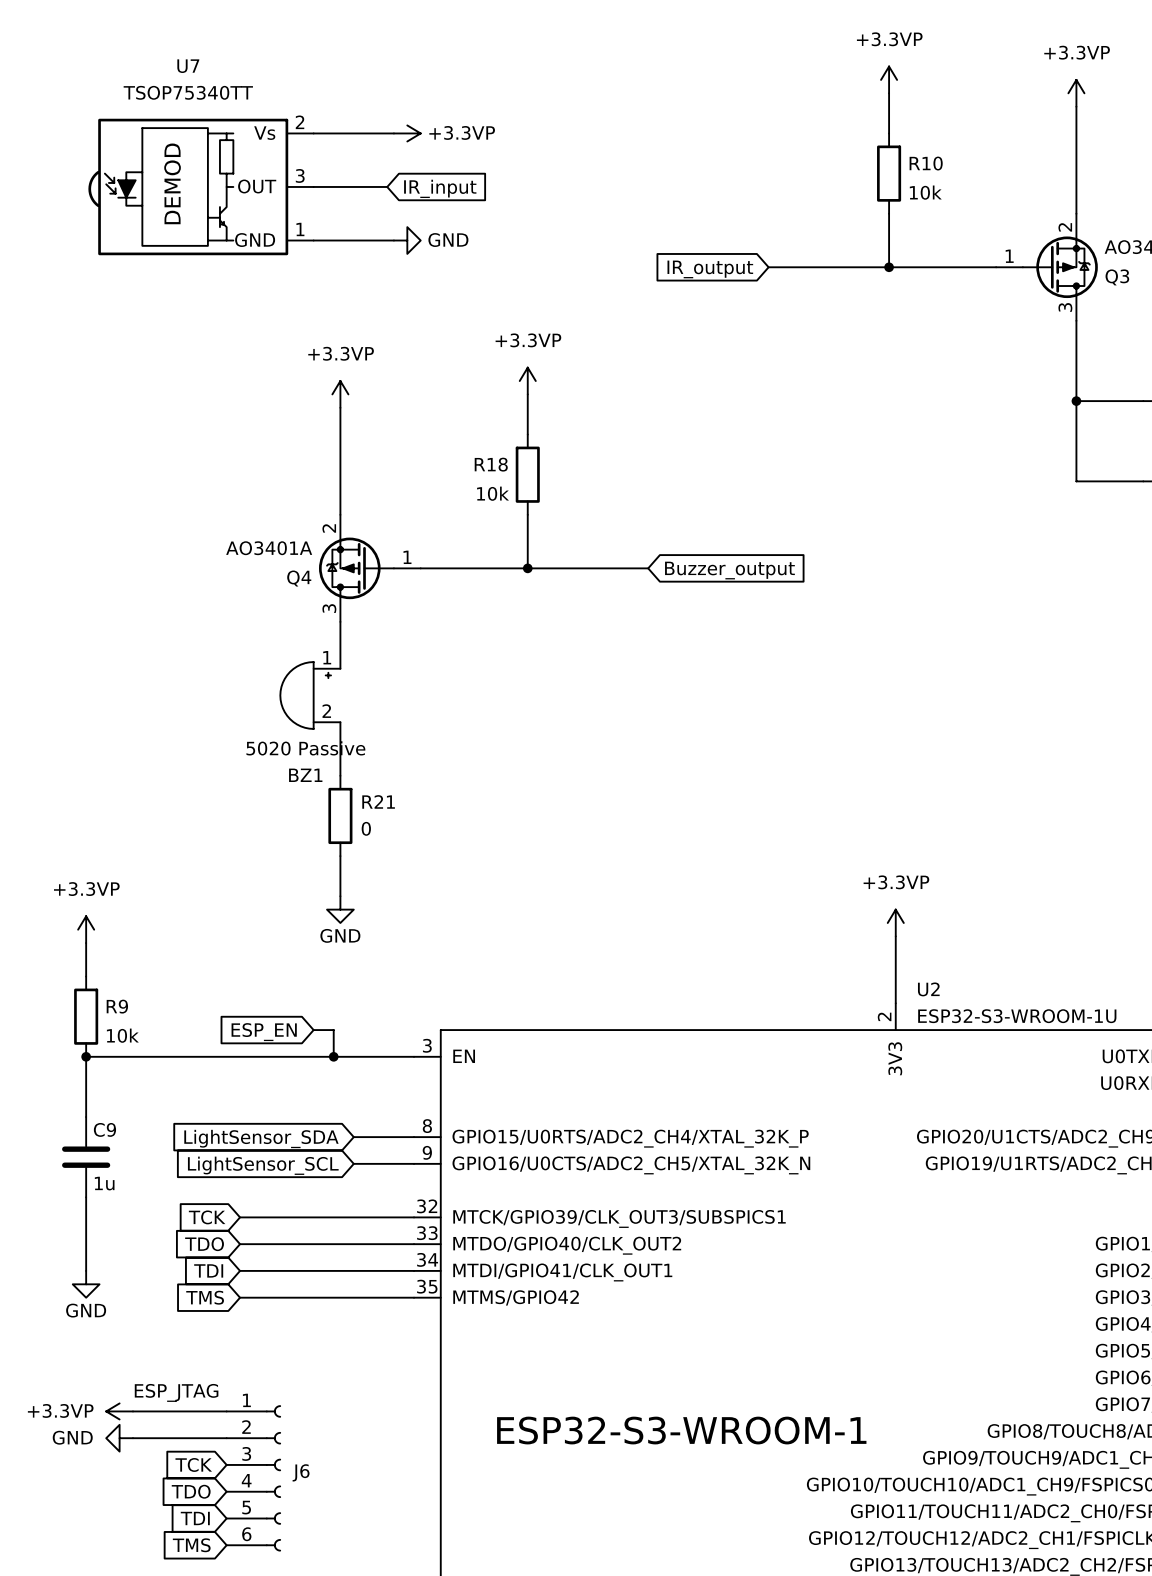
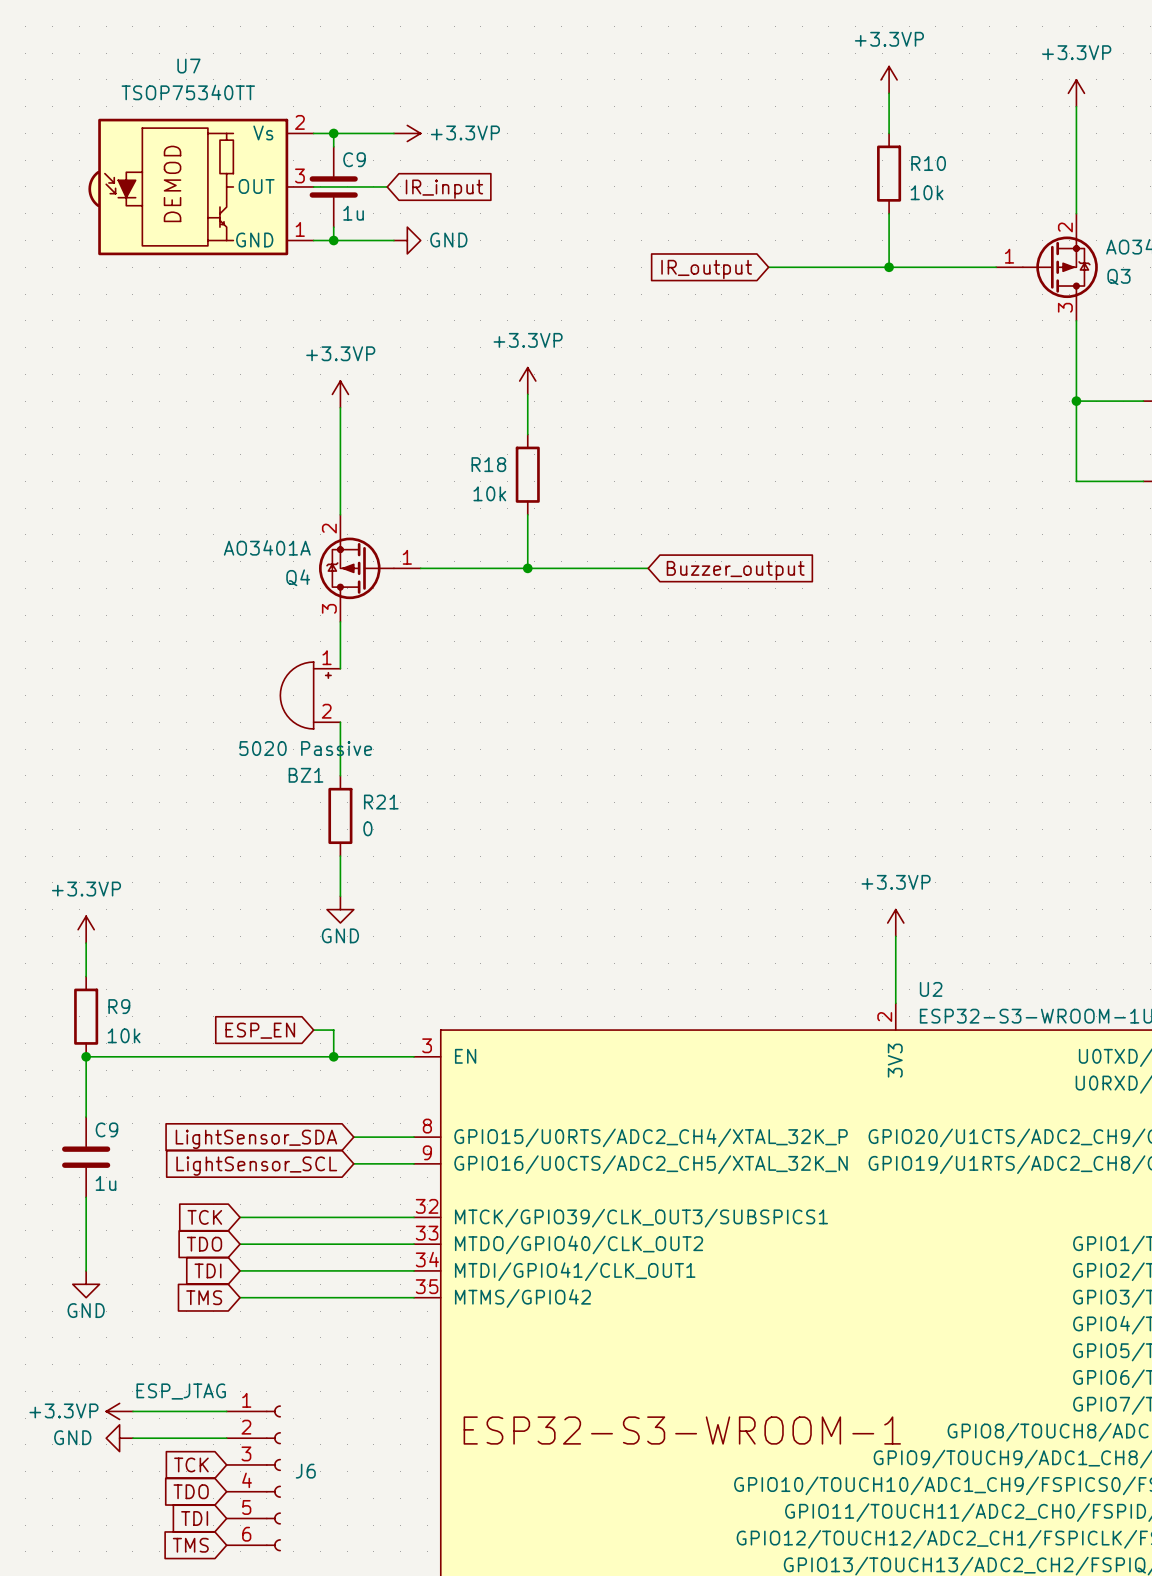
wire: none -> (333, 133) (333, 146)
junction: none -> (333, 133)
C9: none -> 1u (333, 186)
wire: none -> (333, 227) (333, 240)
junction: none -> (333, 240)

